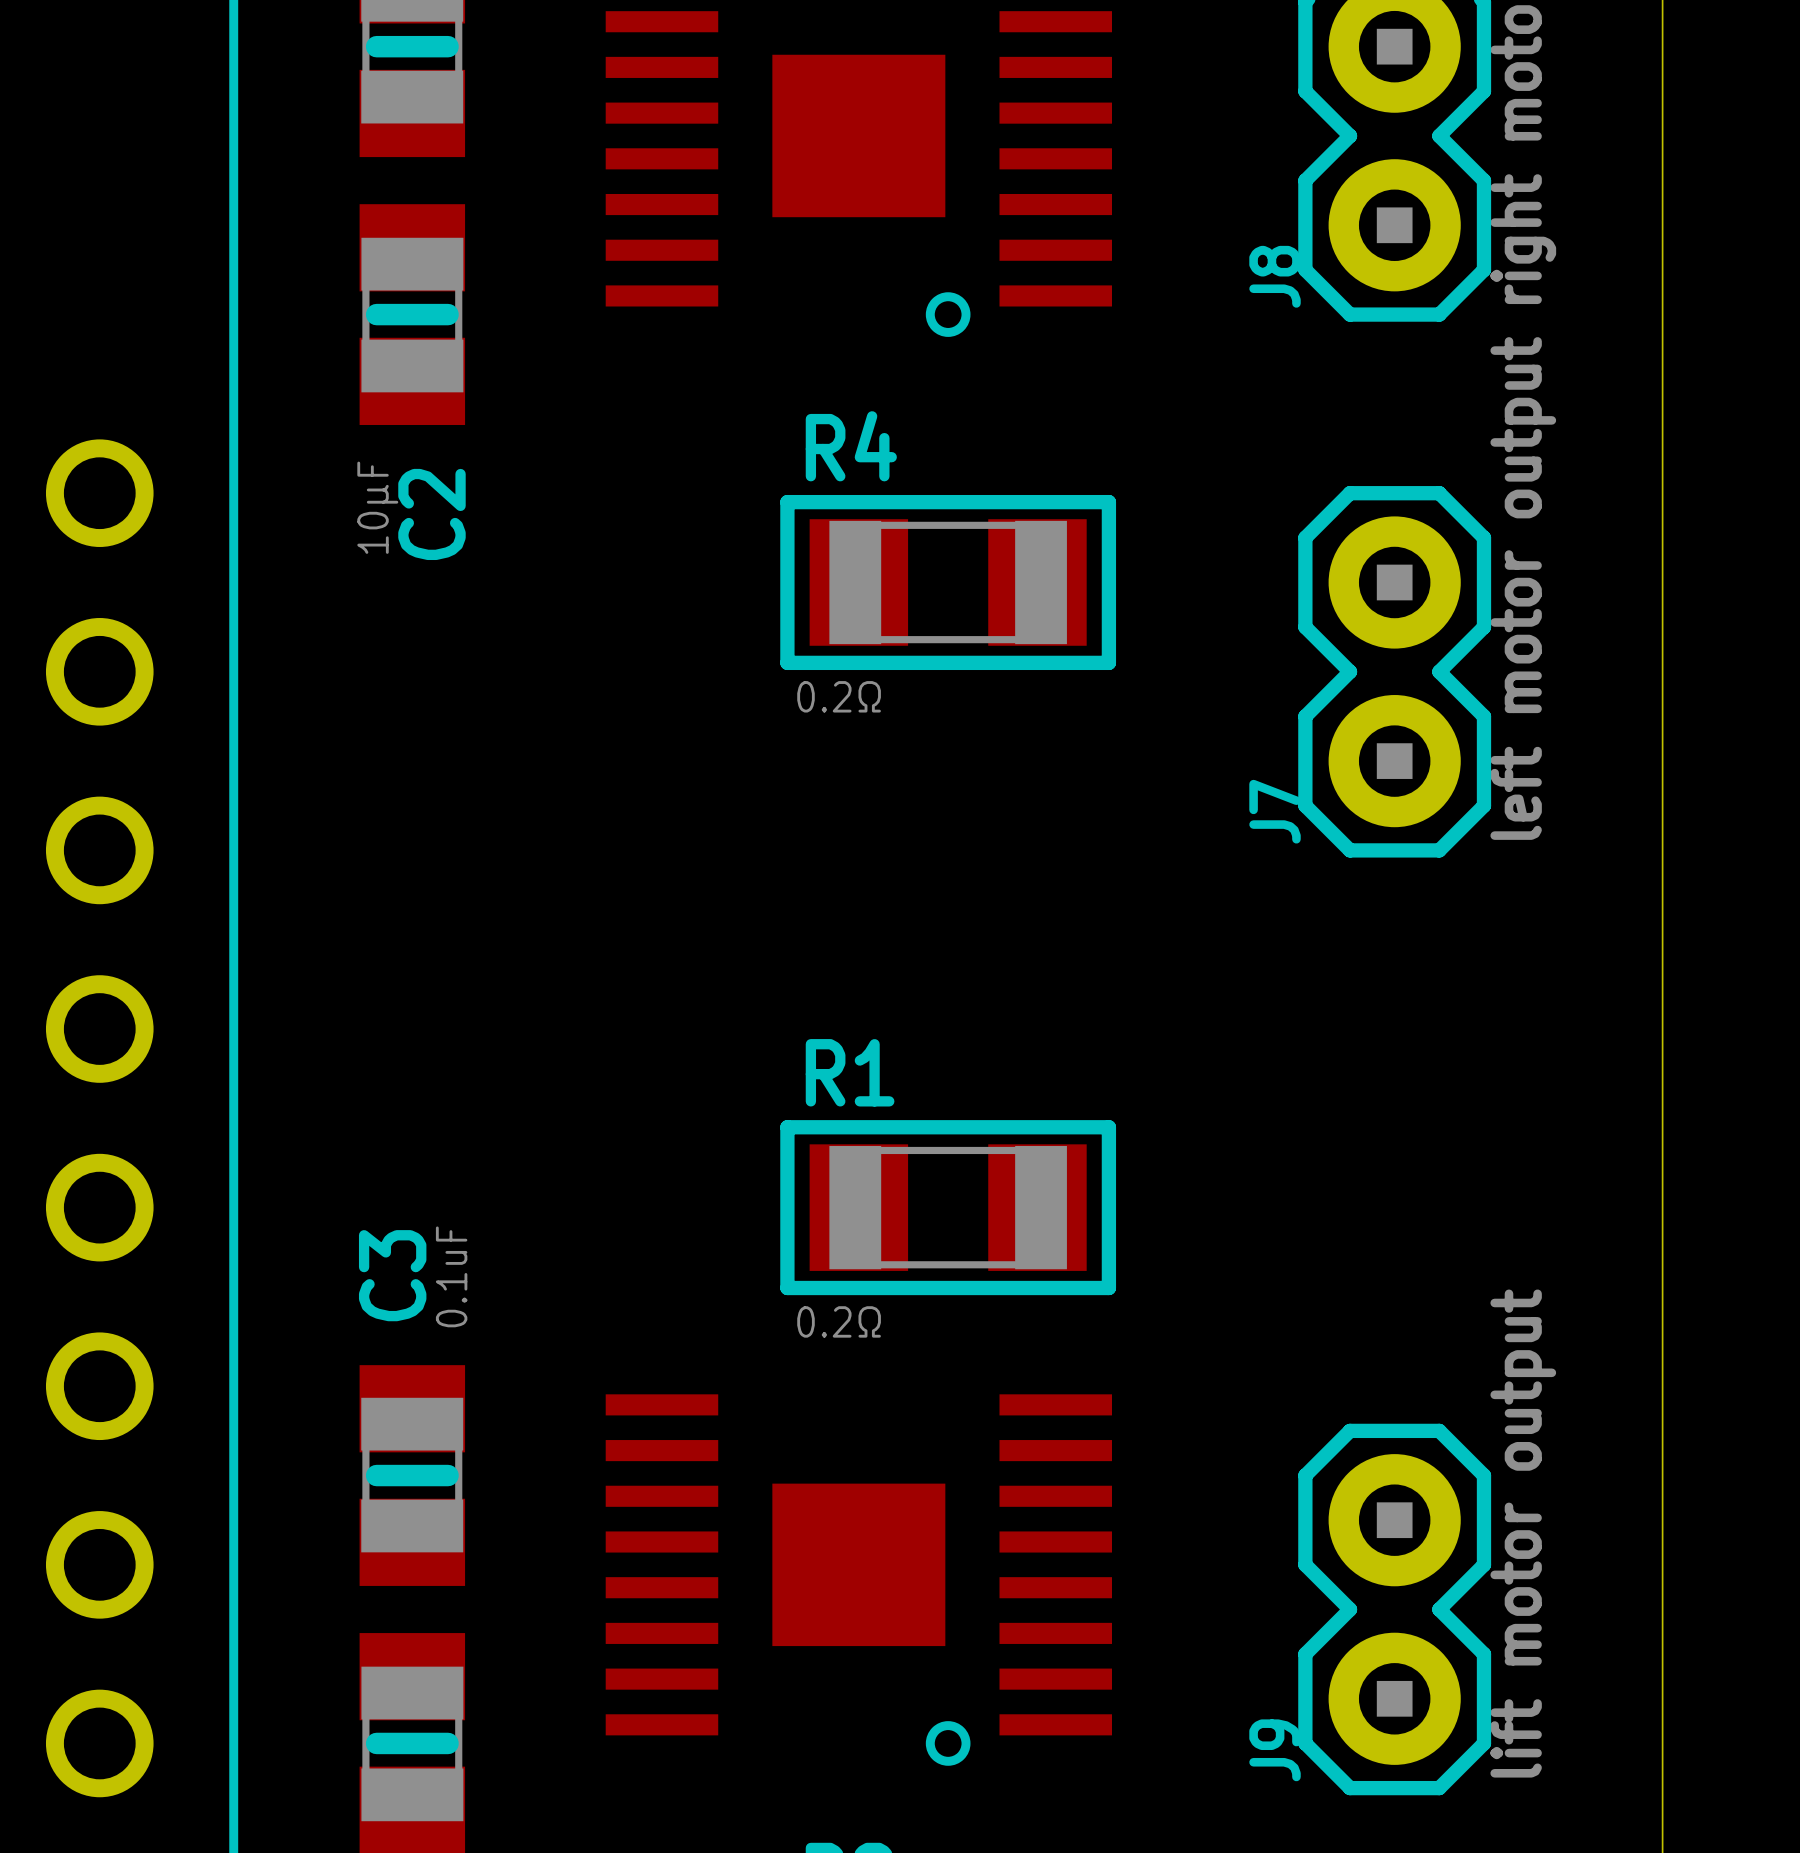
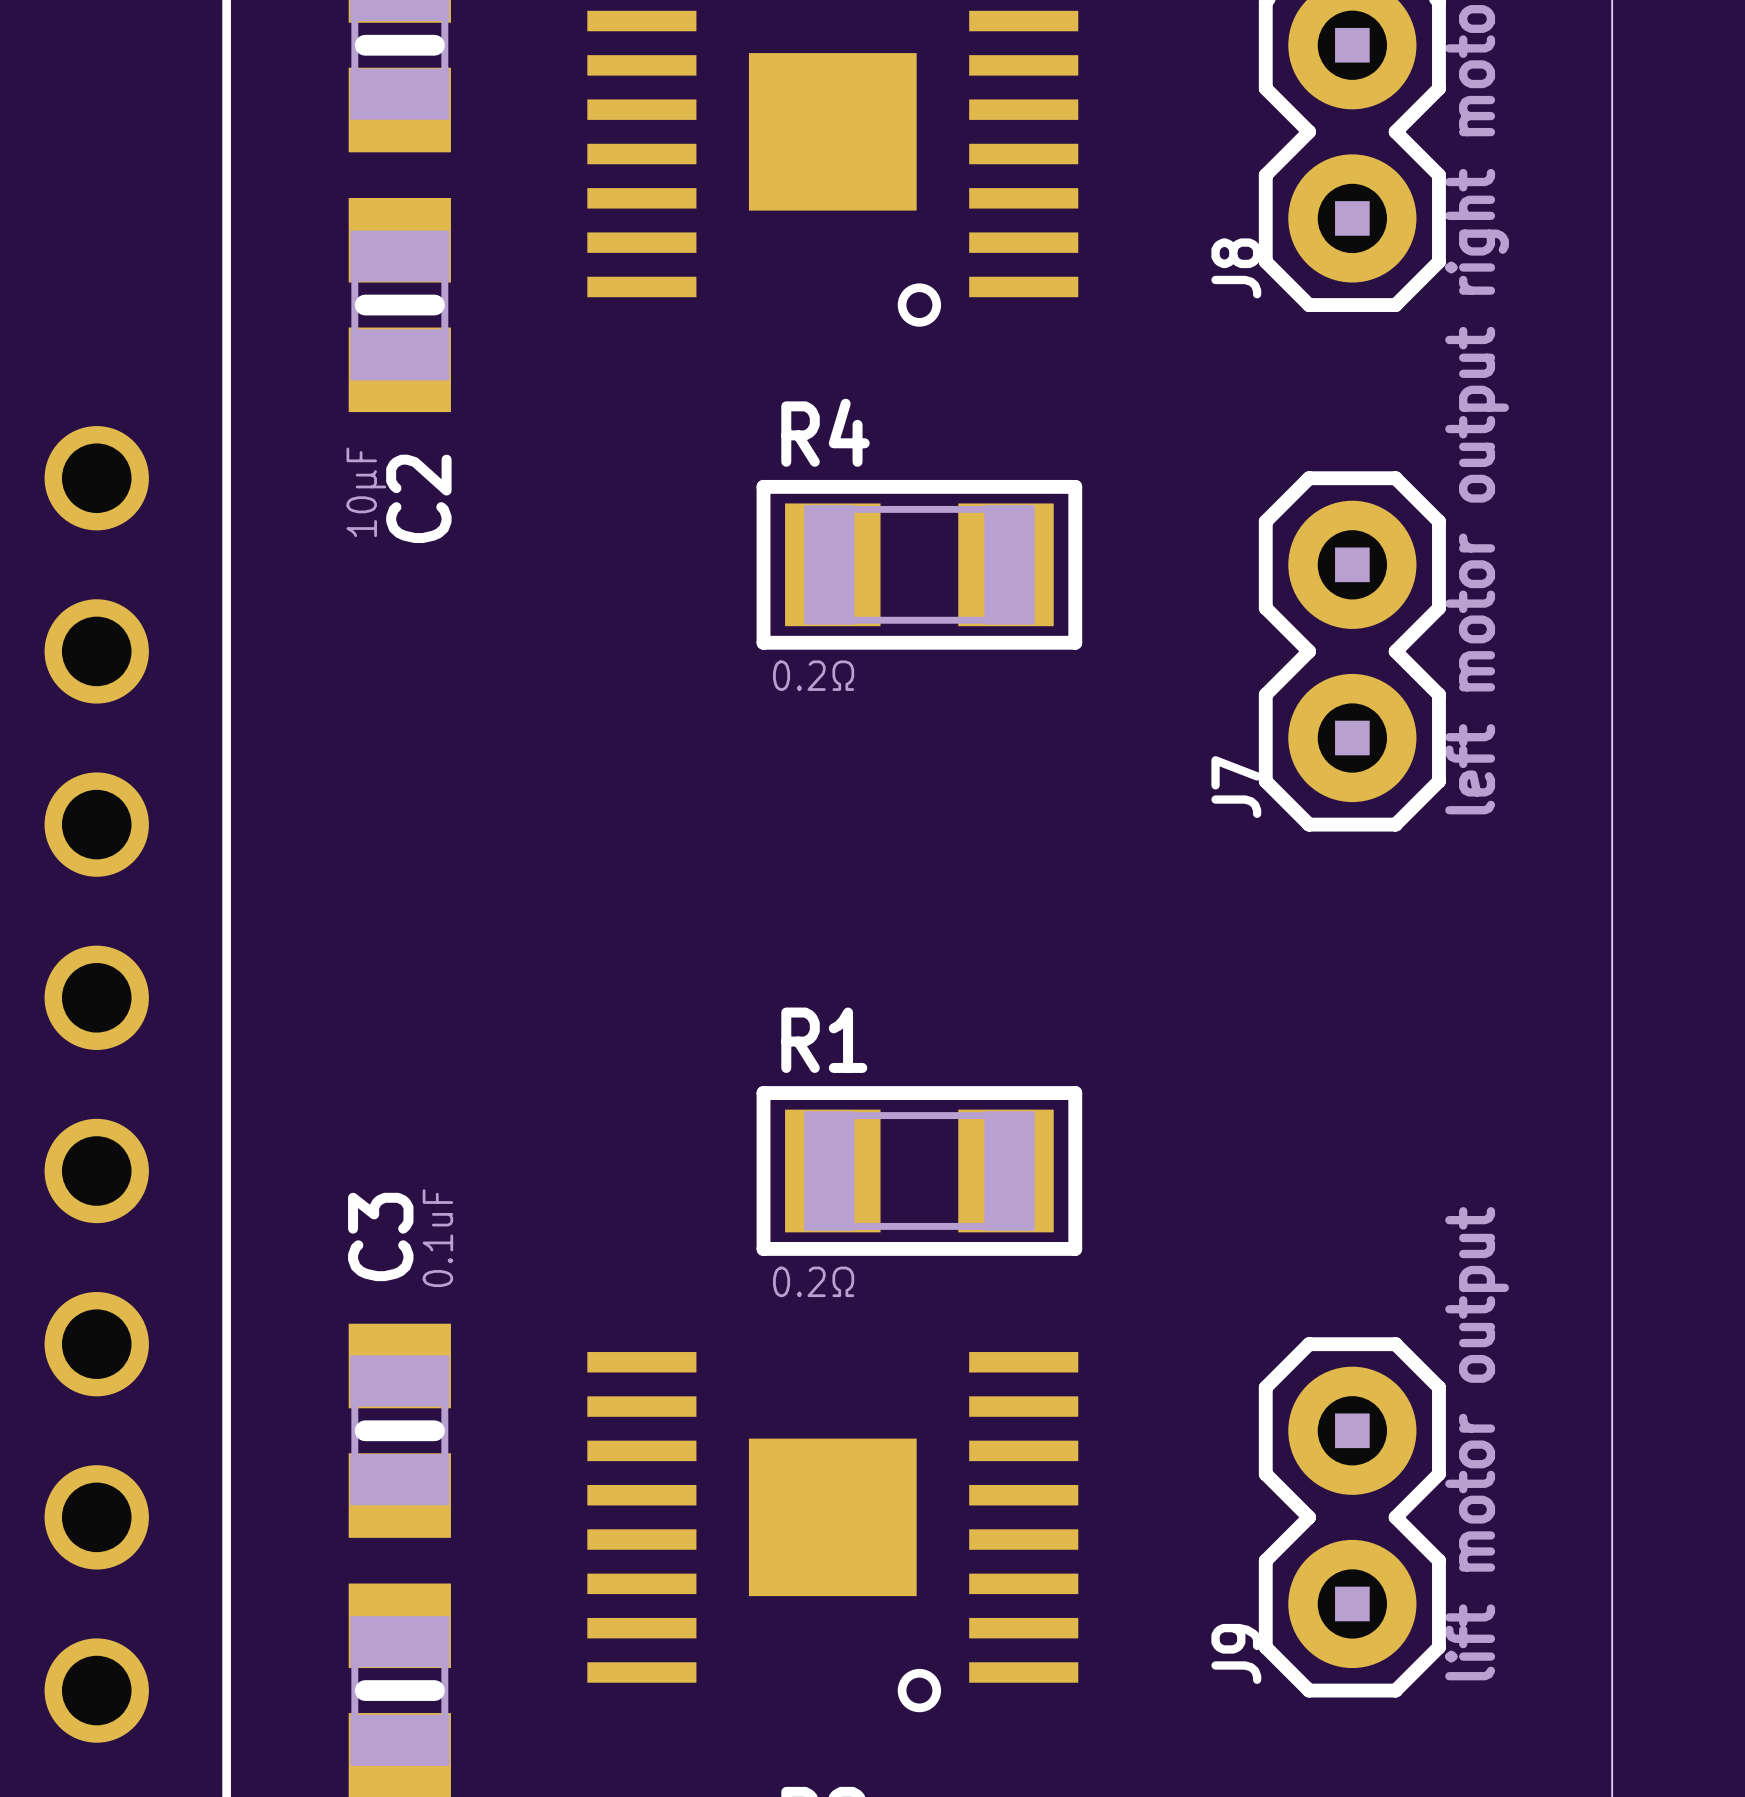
J9 position: (1394, 1609) -> (1352, 1517)

